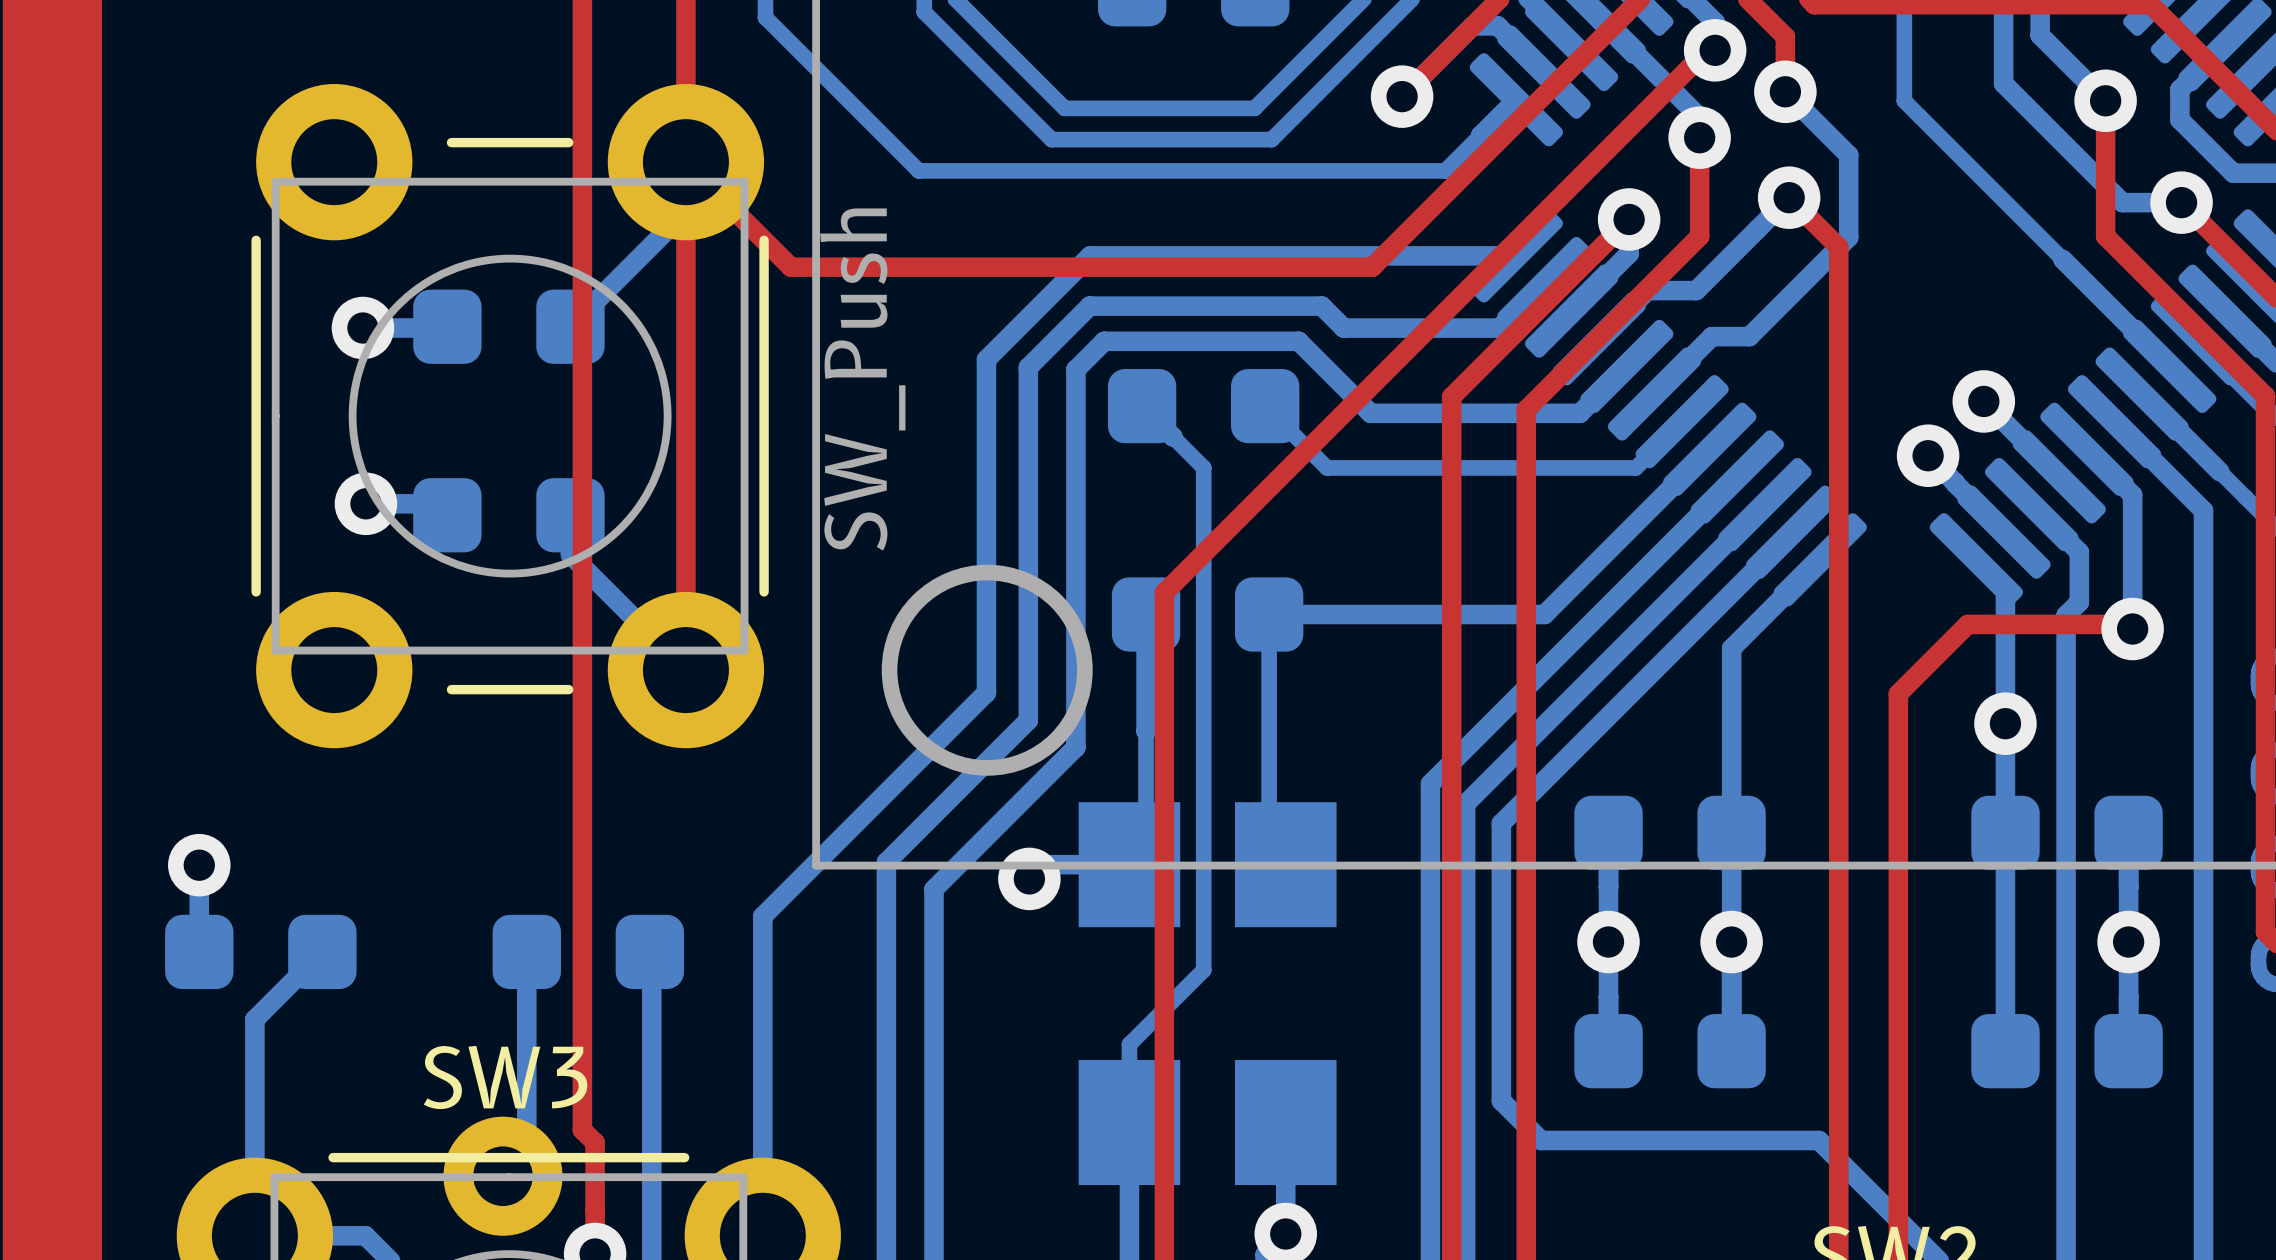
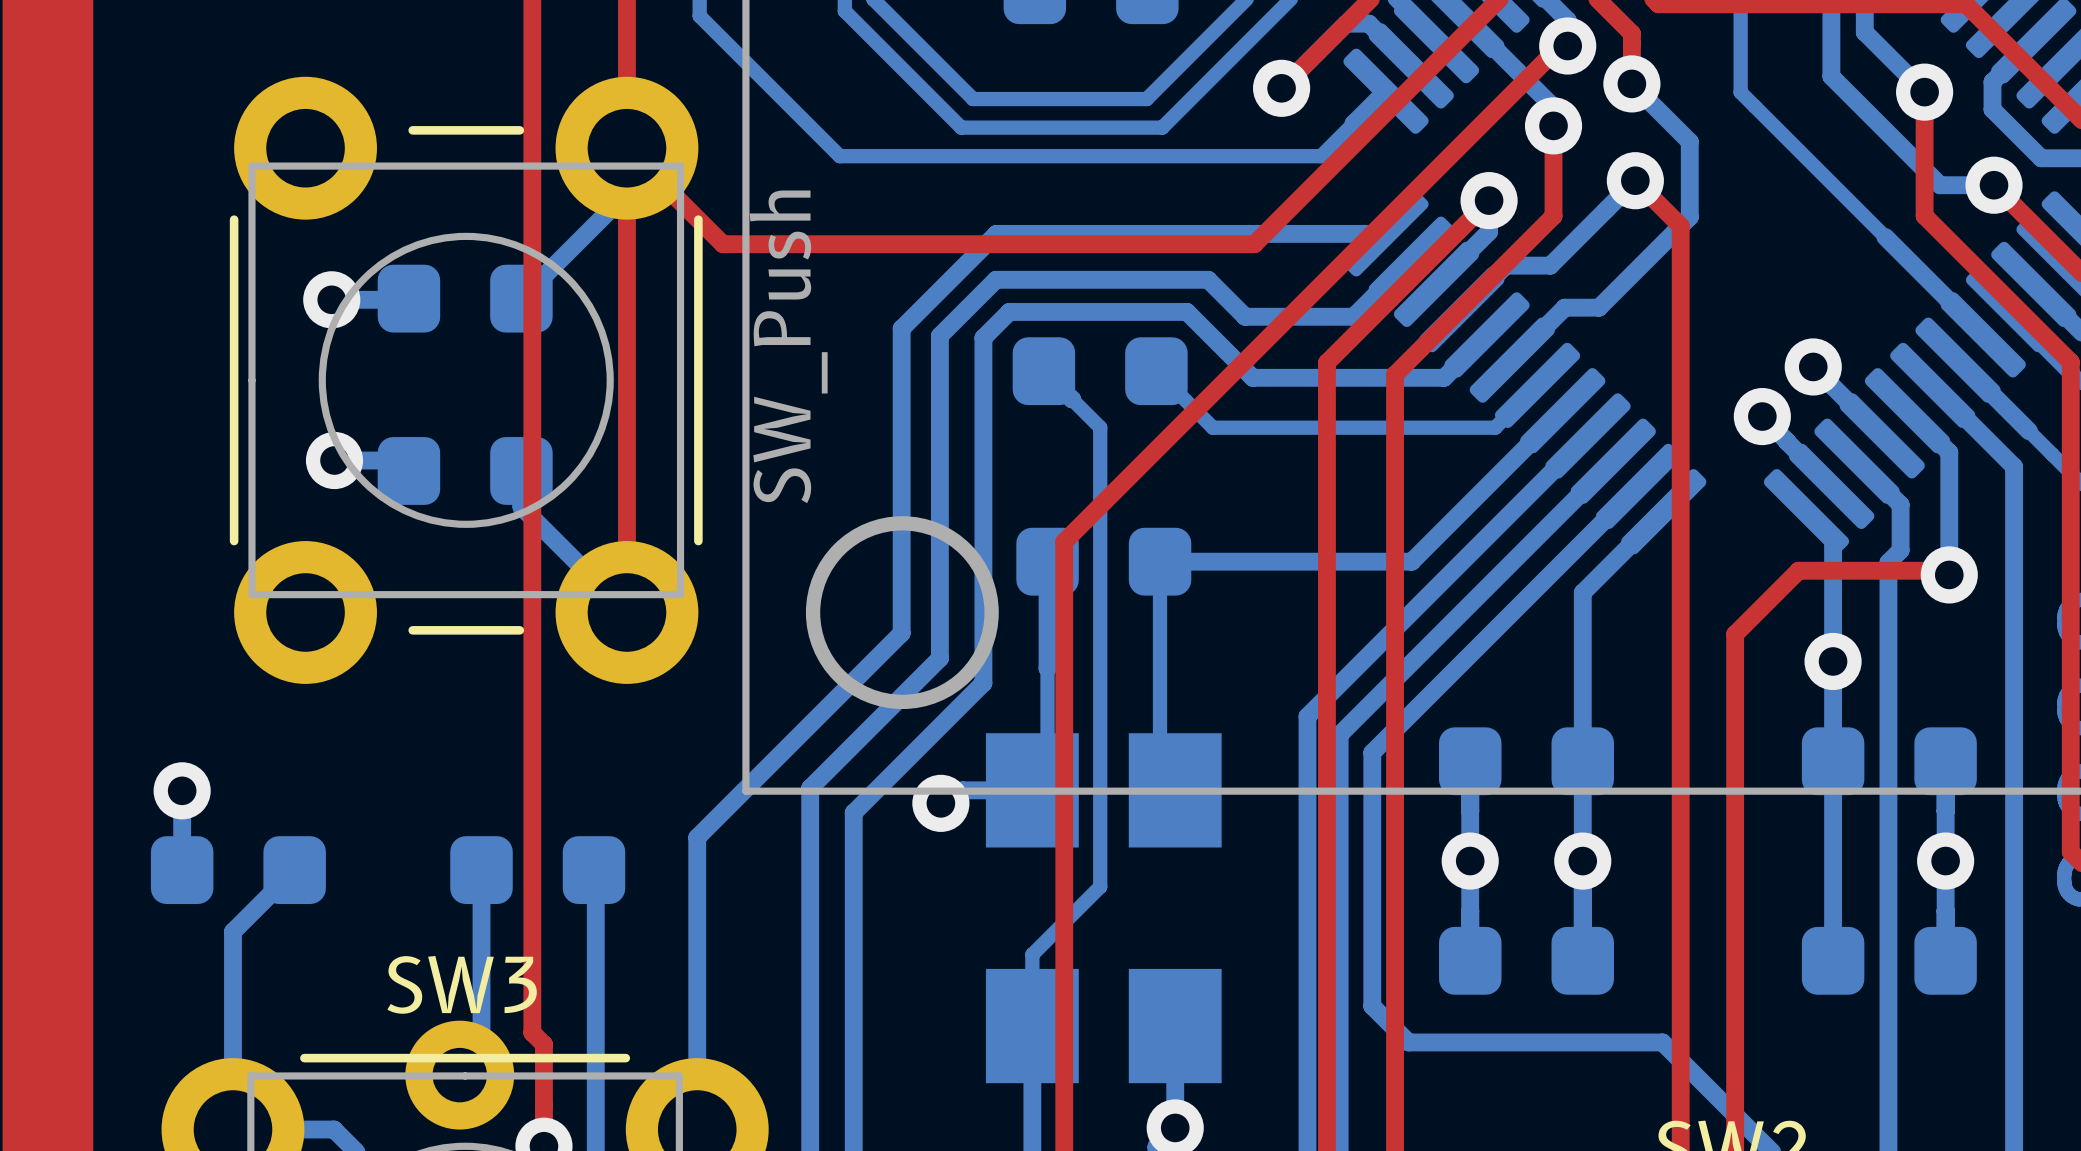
bottom track: (1343, 328) (1499, 328) -> (1228, 299) (1245, 316) (1353, 316) (1370, 299)

